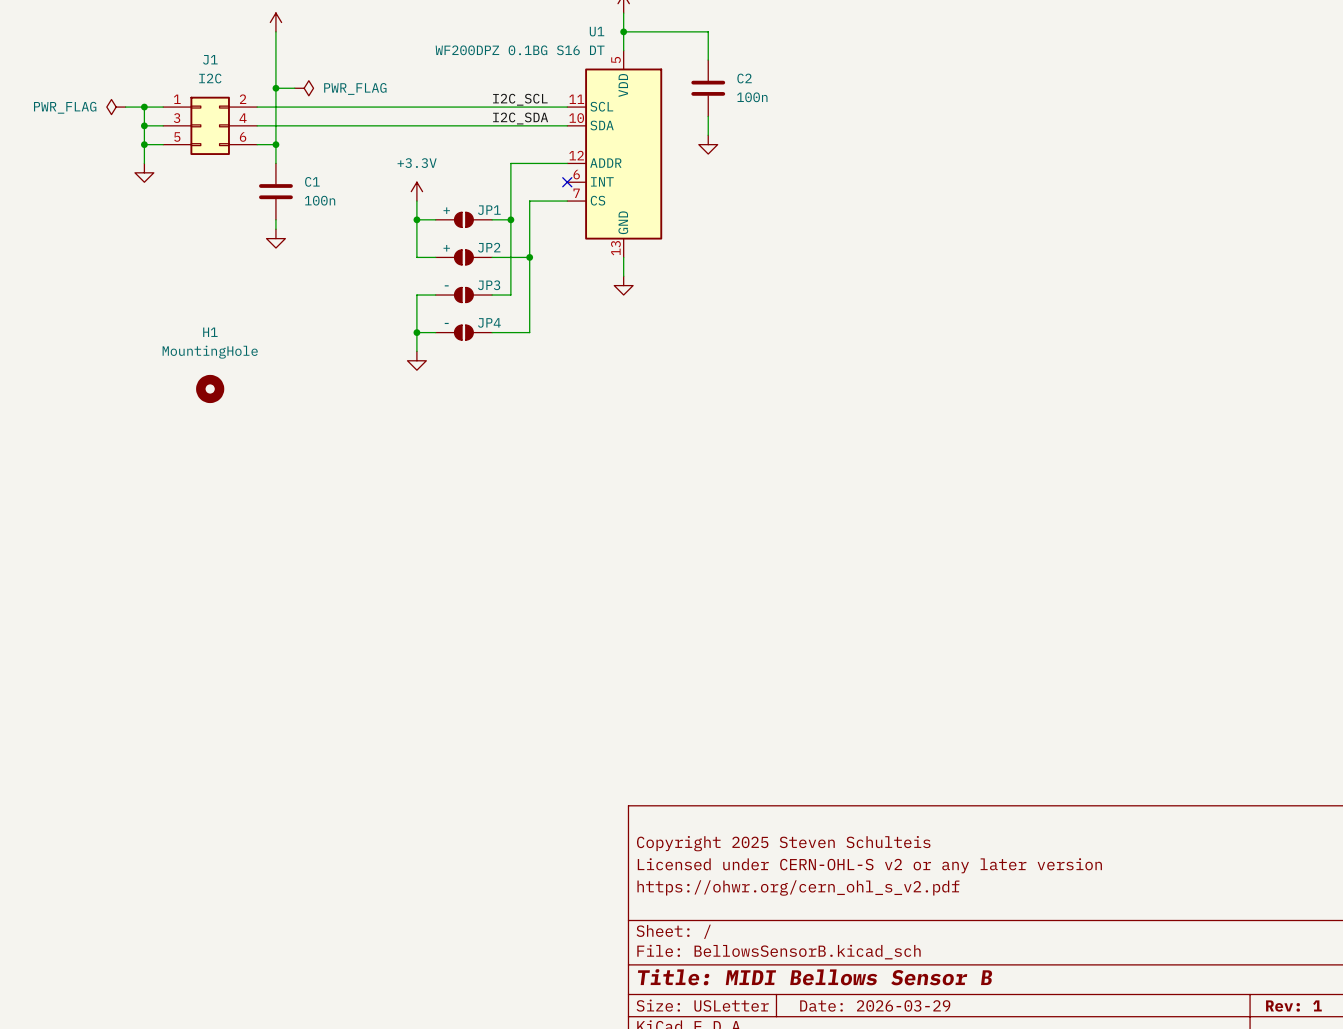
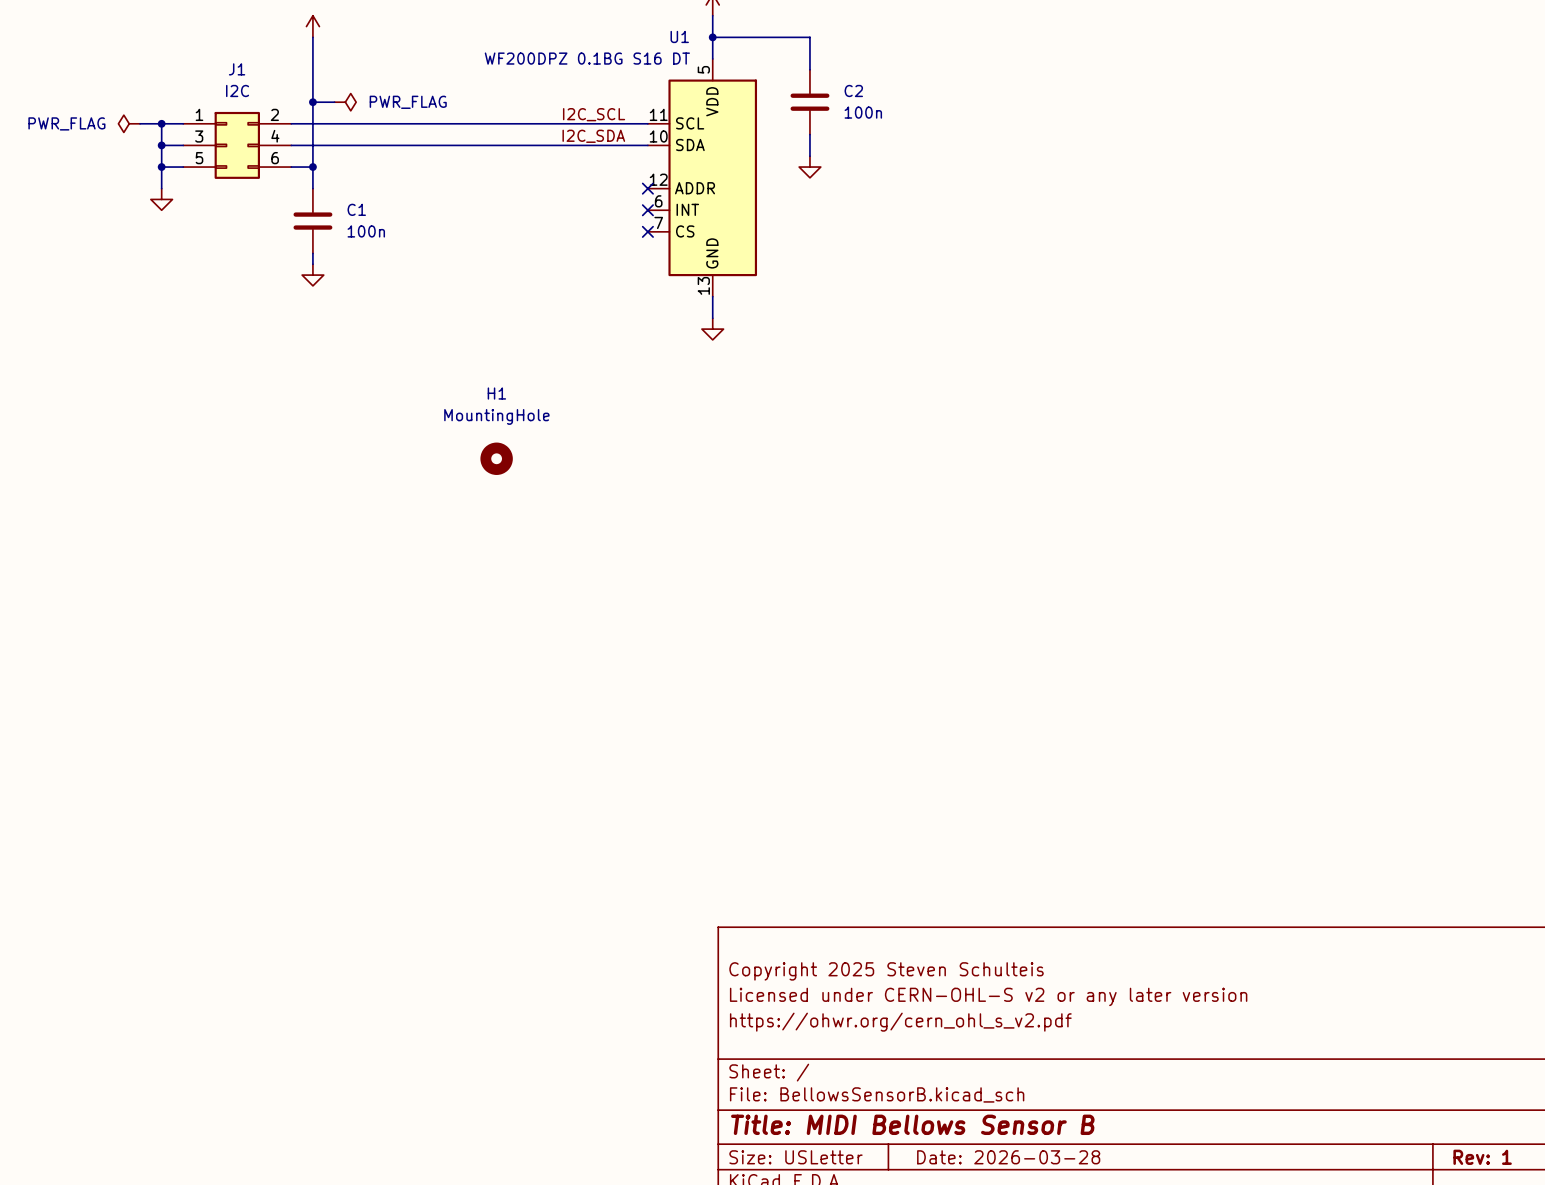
wire: (567, 163) (510, 163) (510, 295) (492, 295) -> none
no-connect mark: none -> (647, 188)
power symbol: +3.3V (416, 191) -> none
wire: (416, 201) (416, 257) (435, 257) -> none
wire: (567, 201) (529, 201) (529, 332) (492, 332) -> none
no-connect mark: none -> (647, 231)
wire: (416, 219) (435, 219) -> none
junction: (416, 219) -> none
JP1: + (463, 219) -> none
wire: (492, 219) (510, 219) -> none
junction: (510, 219) -> none
JP2: + (463, 257) -> none
wire: (492, 257) (529, 257) -> none
junction: (529, 257) -> none
wire: (435, 295) (416, 295) (416, 351) -> none
JP3: - (463, 295) -> none
wire: (416, 332) (435, 332) -> none
junction: (416, 332) -> none
JP4: - (463, 332) -> none
power symbol: (416, 360) -> none
H1 position: (210, 388) -> (496, 458)
title block: Date: 2026-03-29 (875, 1005) -> Date: 2026-03-28 (1008, 1157)

